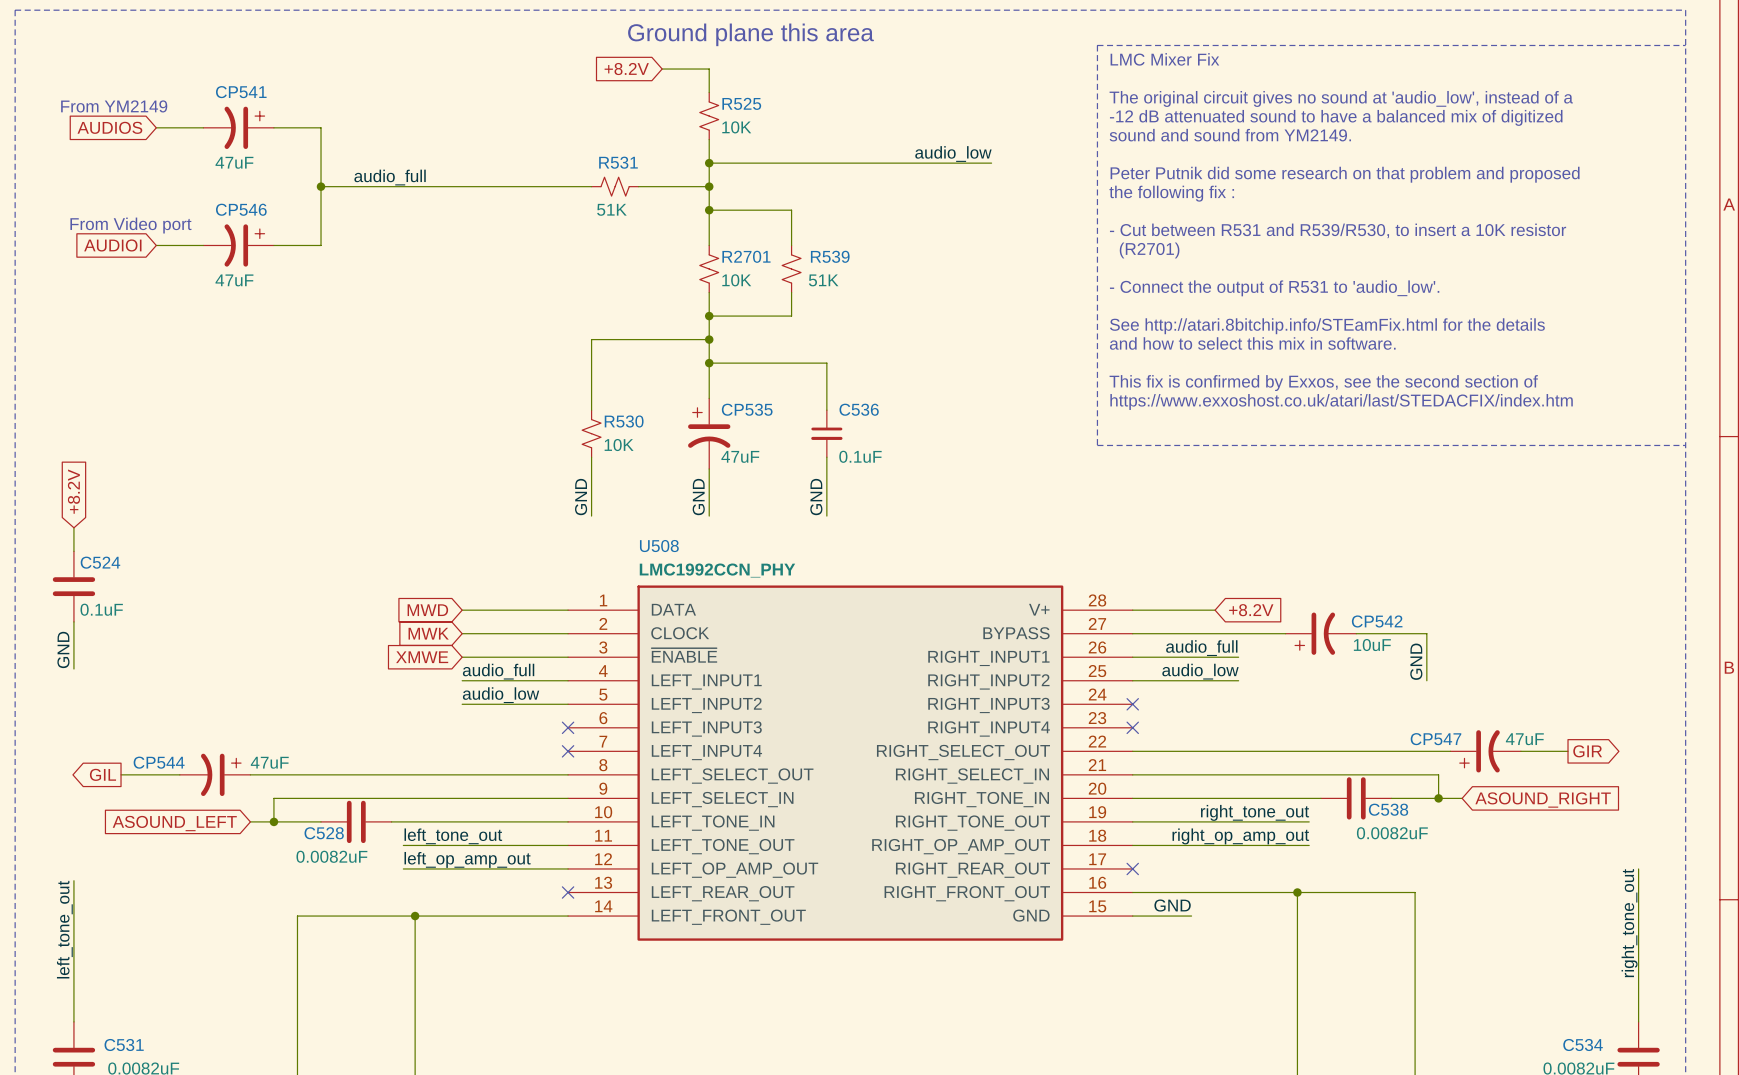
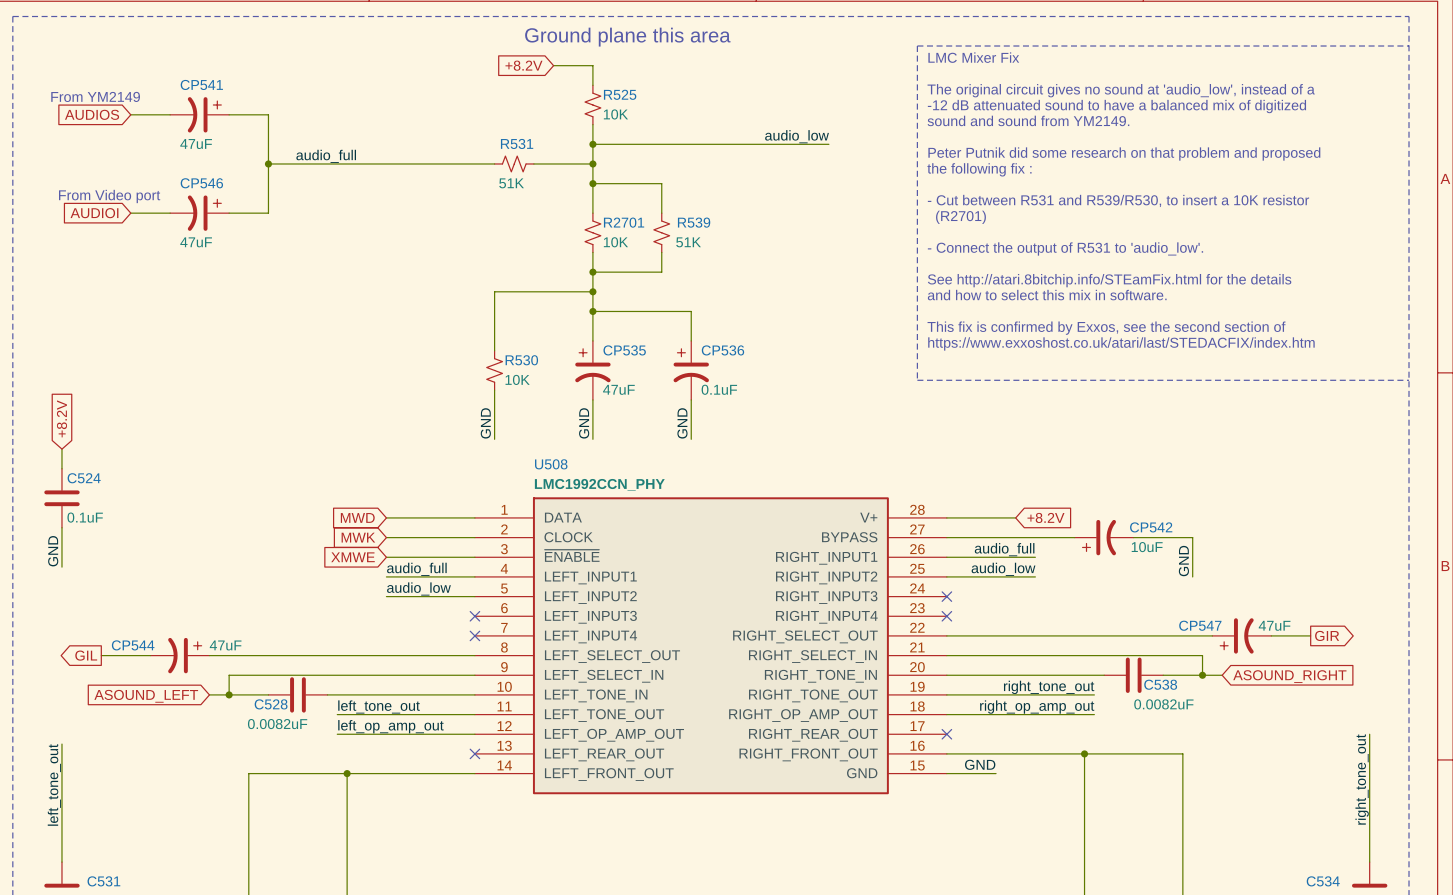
C536: 0.1uF (826, 433) -> none
CP536: none -> 0.1uF (691, 370)

